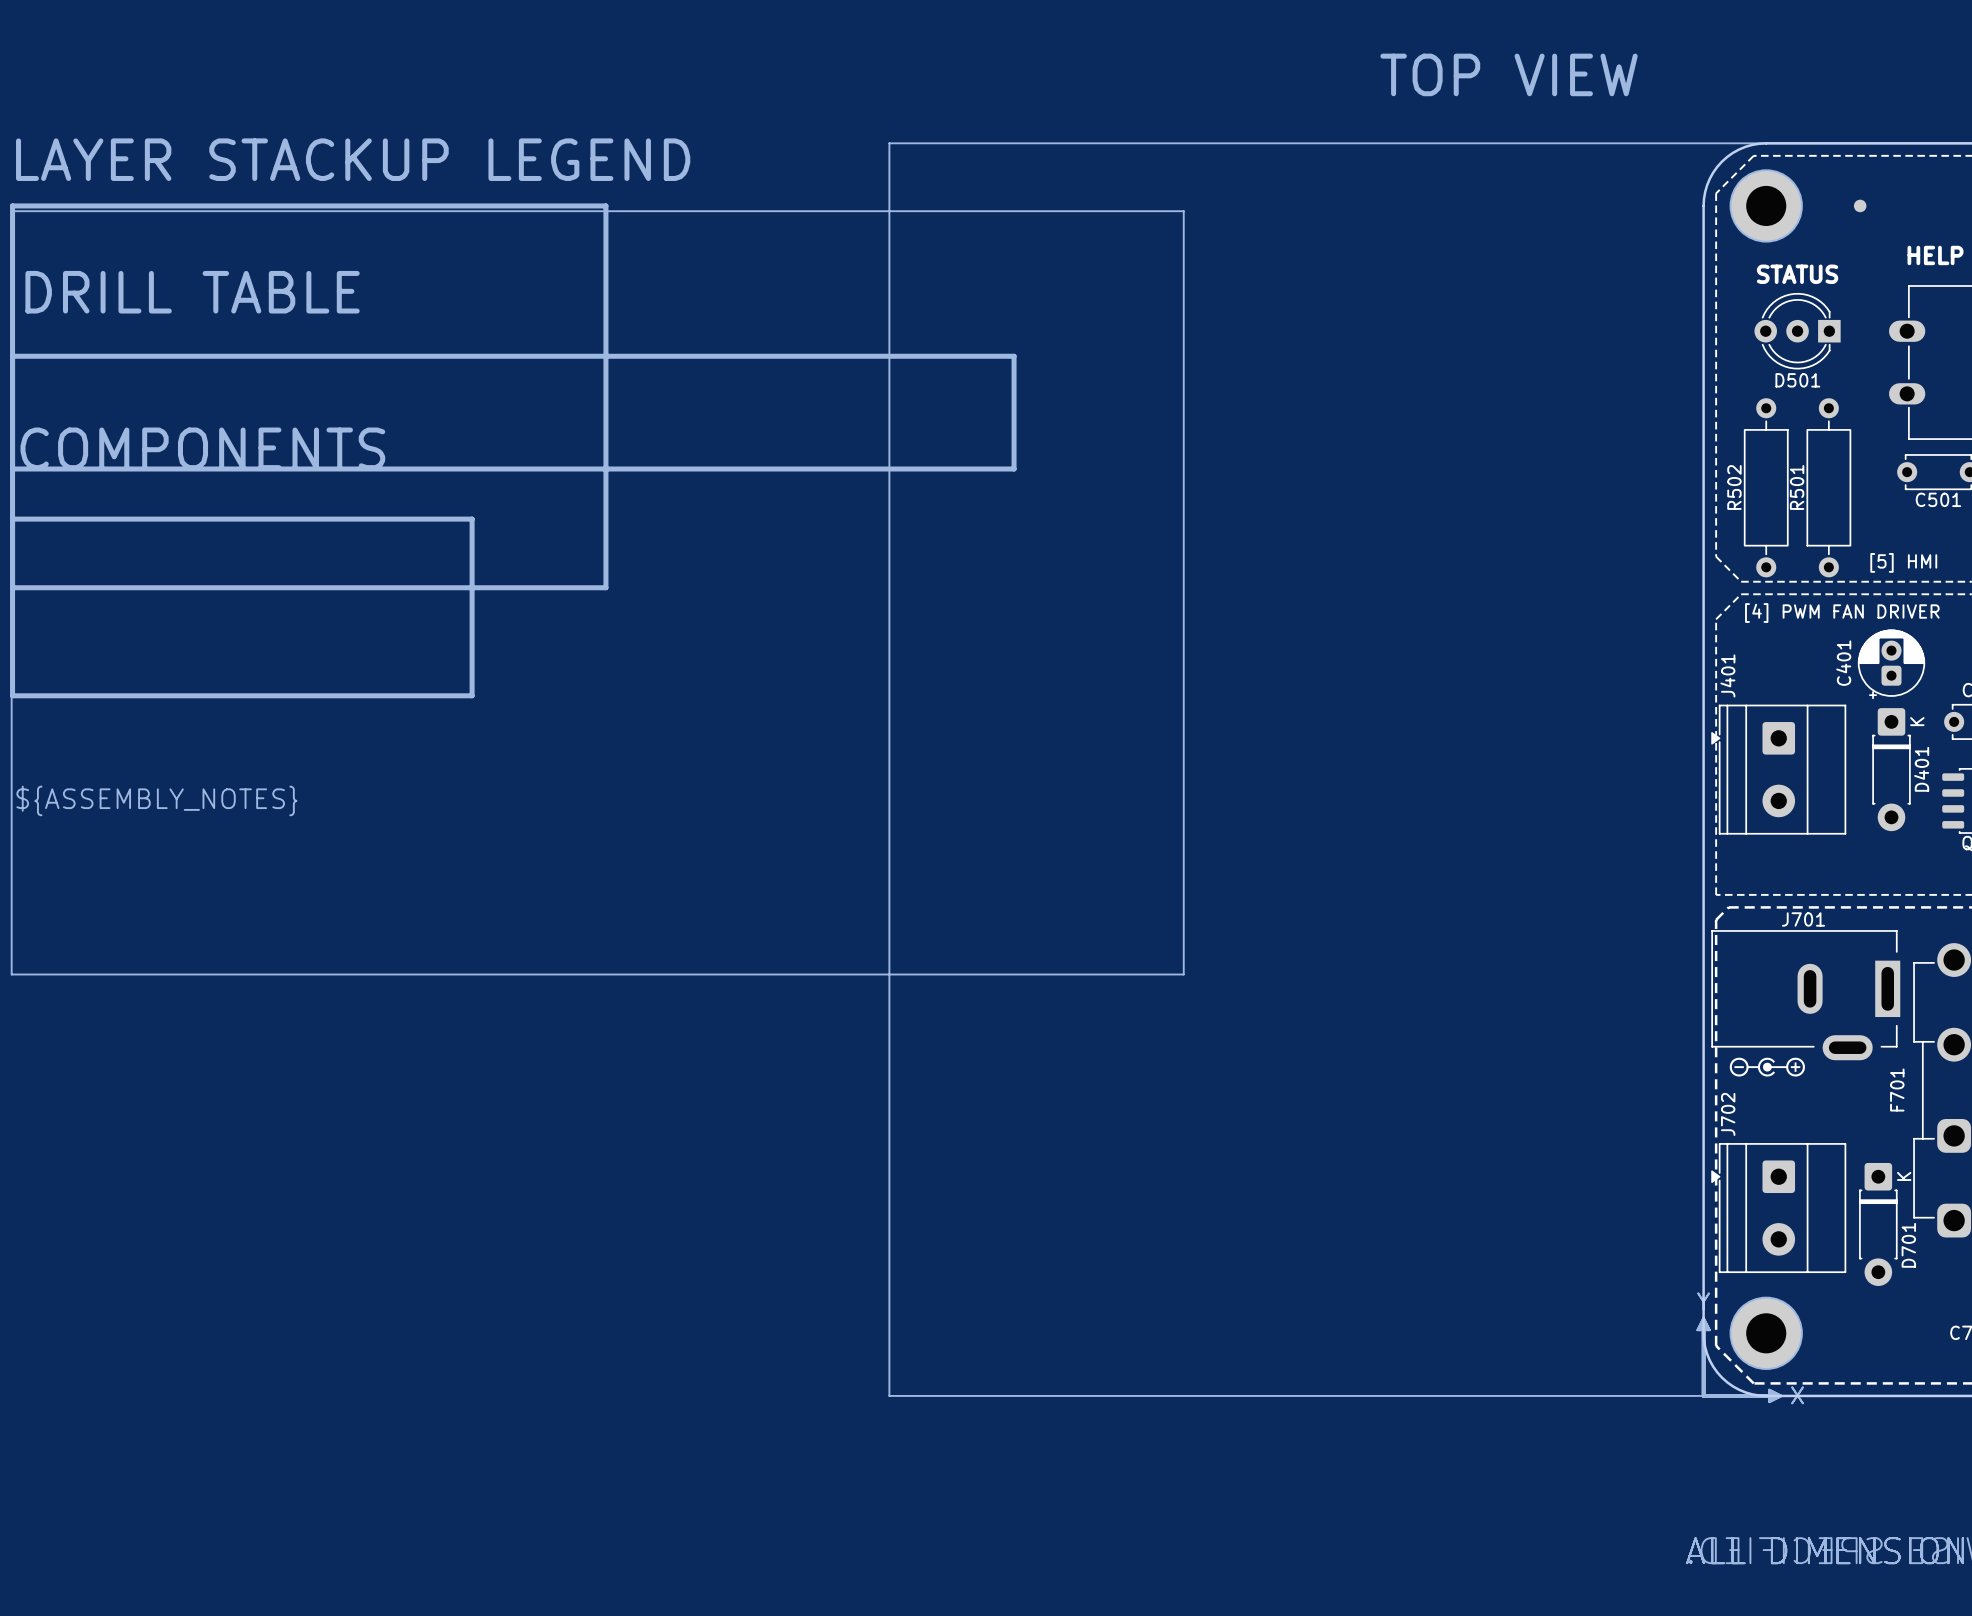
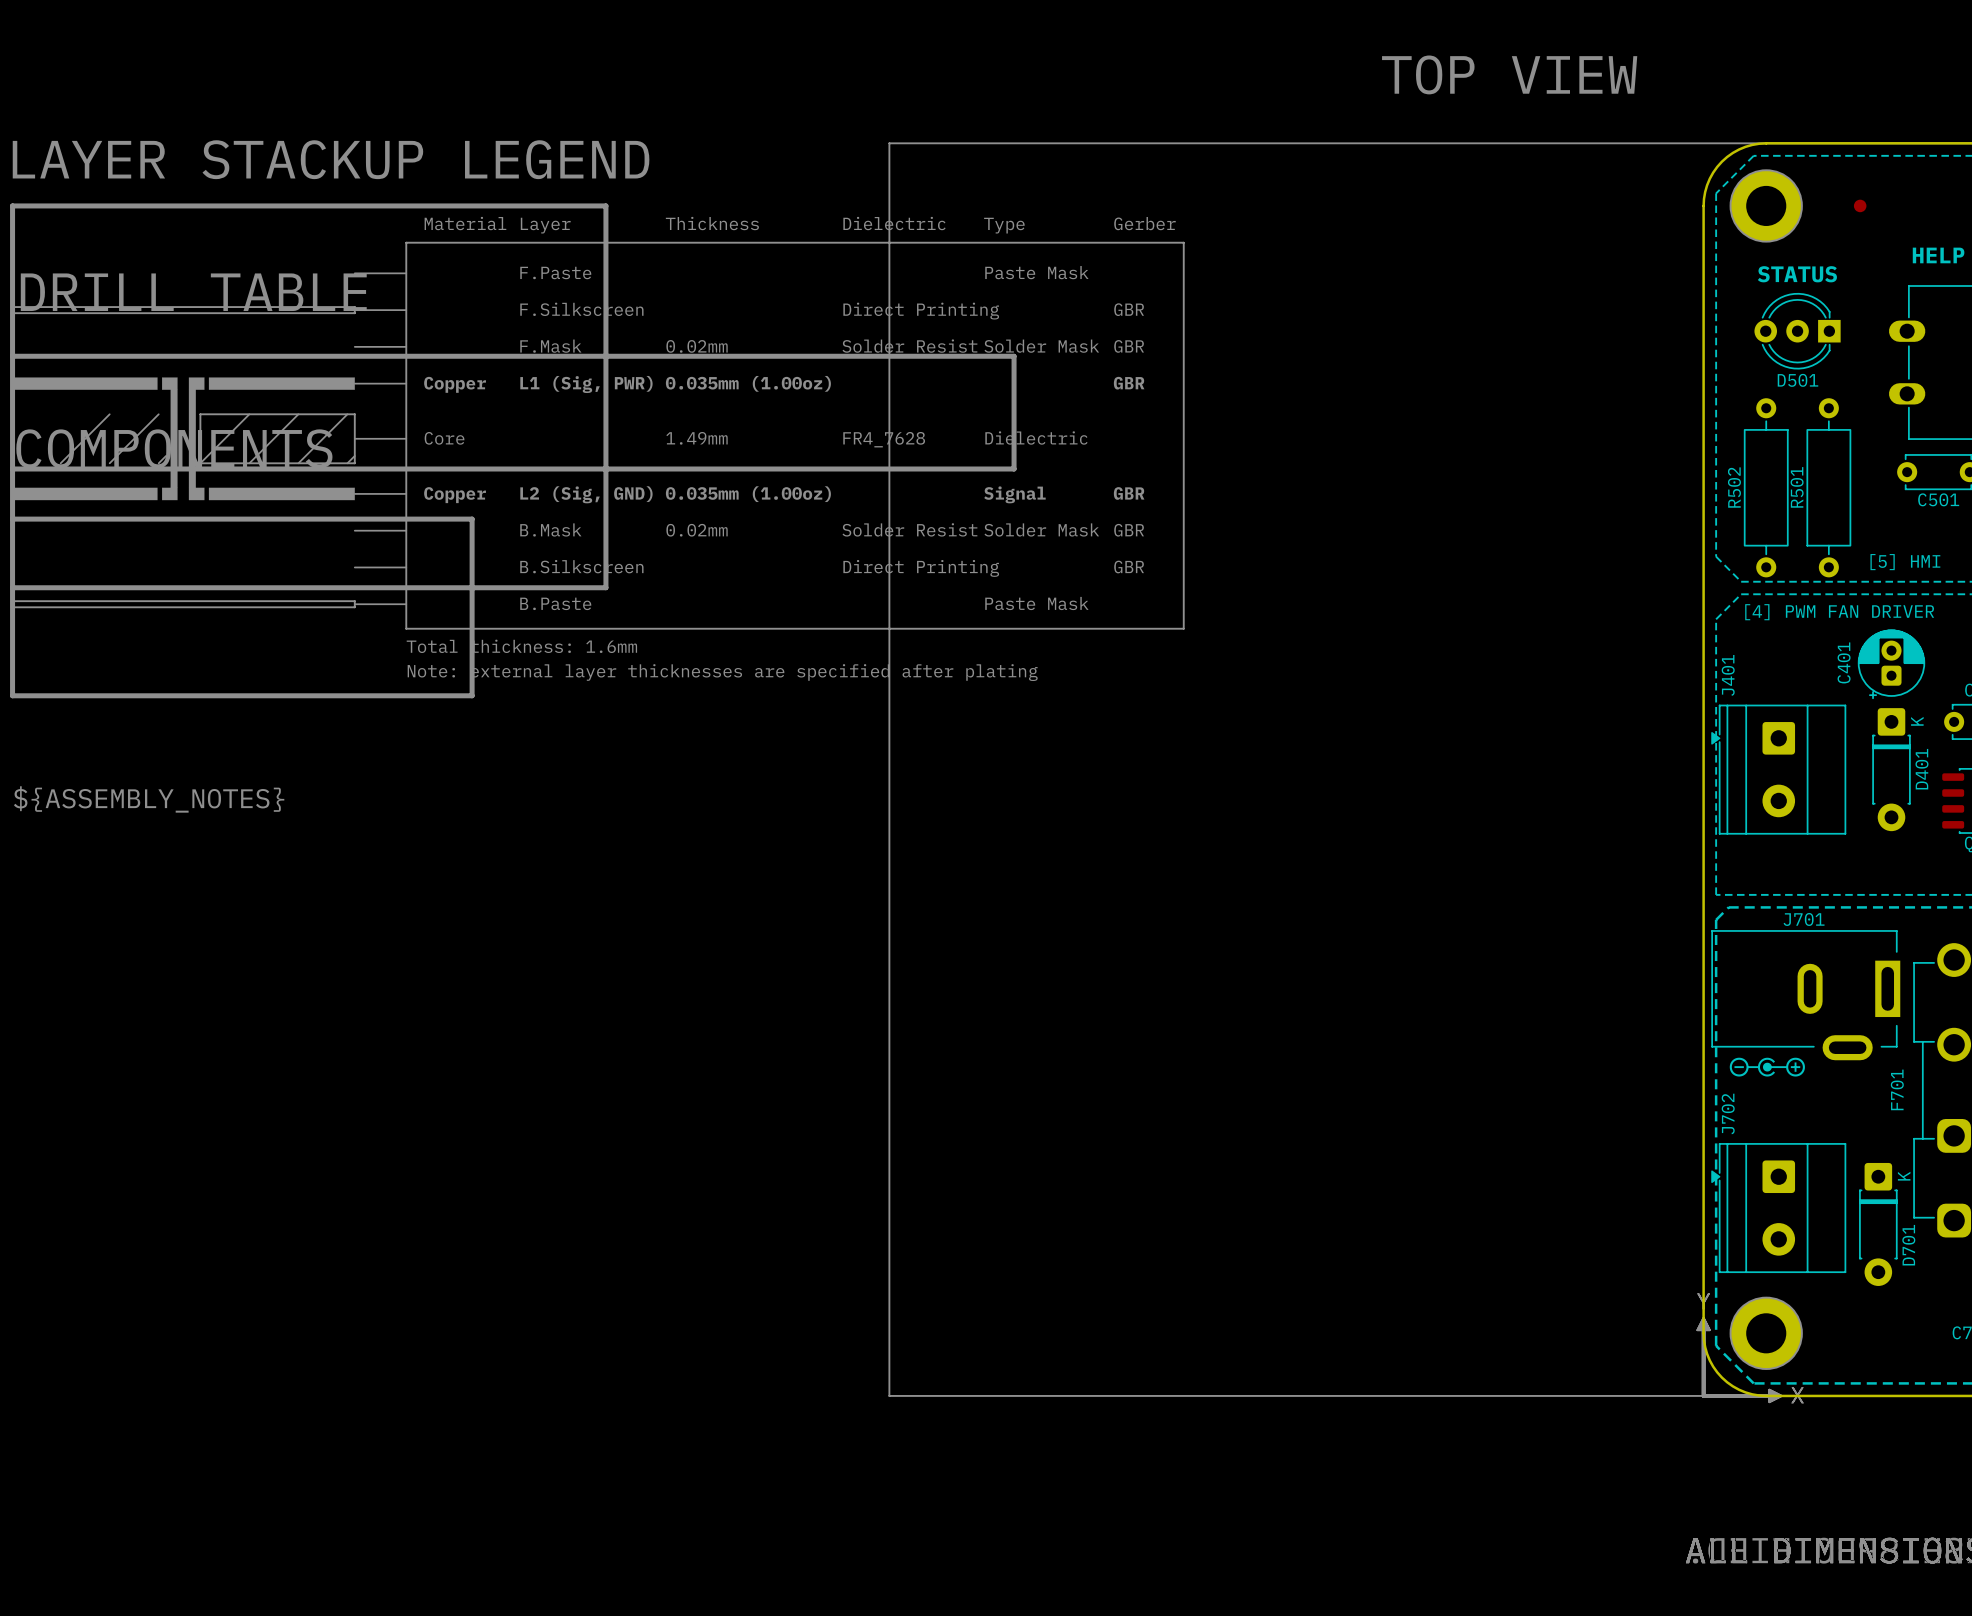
text: none -> Material (465, 223)
text: none -> Thickness (712, 223)
text: none -> Dielectric (894, 223)
text: none -> Gerber (1144, 223)
text: none -> Layer (545, 225)
text: none -> Type (1004, 225)
line: (1183, 242) (1183, 211) (11, 211) (11, 270) -> (1183, 242) (406, 242) (406, 628) (1183, 628)
text: none -> F.Paste (555, 272)
text: none -> Paste Mask (1036, 272)
line: none -> (354, 273) (406, 273)
line: none -> (11, 307) (354, 307) (354, 313) (11, 313)
text: none -> F.Silkscreen (581, 309)
text: none -> GBR (1129, 309)
line: none -> (354, 310) (406, 310)
text: none -> Direct Printing (921, 311)
line: none -> (354, 346) (406, 346)
text: none -> F.Mask (550, 346)
text: none -> 0.02mm (697, 346)
text: none -> Solder Resist (909, 346)
text: none -> Solder Mask (1041, 346)
text: none -> GBR (1129, 346)
drawing: none -> [11, 377, 355, 501]
line: none -> (354, 383) (406, 383)
text: none -> GBR (1129, 383)
text: none -> L1 (Sig, PWR) (586, 384)
text: none -> 0.035mm (1.00oz) (748, 383)
text: none -> Copper (455, 384)
line: none -> (109, 414) (60, 463)
line: none -> (158, 414) (109, 463)
line: none -> (249, 414) (200, 463)
line: none -> (298, 414) (249, 463)
line: none -> (347, 414) (298, 463)
line: none -> (354, 438) (406, 438)
text: none -> Core (444, 438)
text: none -> 1.49mm (697, 438)
text: none -> FR4_7628 (884, 439)
text: none -> Dielectric (1036, 438)
line: none -> (166, 455) (158, 463)
line: none -> (354, 455) (347, 463)
line: none -> (200, 463) (354, 463) (354, 414) (200, 414) (200, 463)
line: none -> (354, 493) (406, 493)
text: none -> GBR (1129, 493)
text: none -> L2 (Sig, GND) (586, 494)
text: none -> 0.035mm (1.00oz) (748, 494)
text: none -> Copper (455, 495)
text: none -> Signal (1014, 494)
line: none -> (354, 530) (406, 530)
text: none -> B.Mask (550, 529)
text: none -> 0.02mm (697, 530)
text: none -> Solder Resist (909, 529)
text: none -> Solder Mask (1041, 529)
text: none -> GBR (1129, 530)
line: none -> (354, 567) (406, 567)
text: none -> B.Silkscreen (581, 566)
text: none -> GBR (1129, 567)
text: none -> Direct Printing (921, 568)
text: none -> B.Paste (555, 603)
text: none -> Paste Mask (1036, 603)
line: none -> (354, 604) (406, 604)
line: (11, 607) (11, 974) (1183, 974) (1183, 628) -> (11, 607) (354, 607) (354, 601) (11, 601)
text: none -> Total thickness: 1.6mm (521, 646)
text: none -> Note: external layer thicknesses are specified after plating (722, 672)

